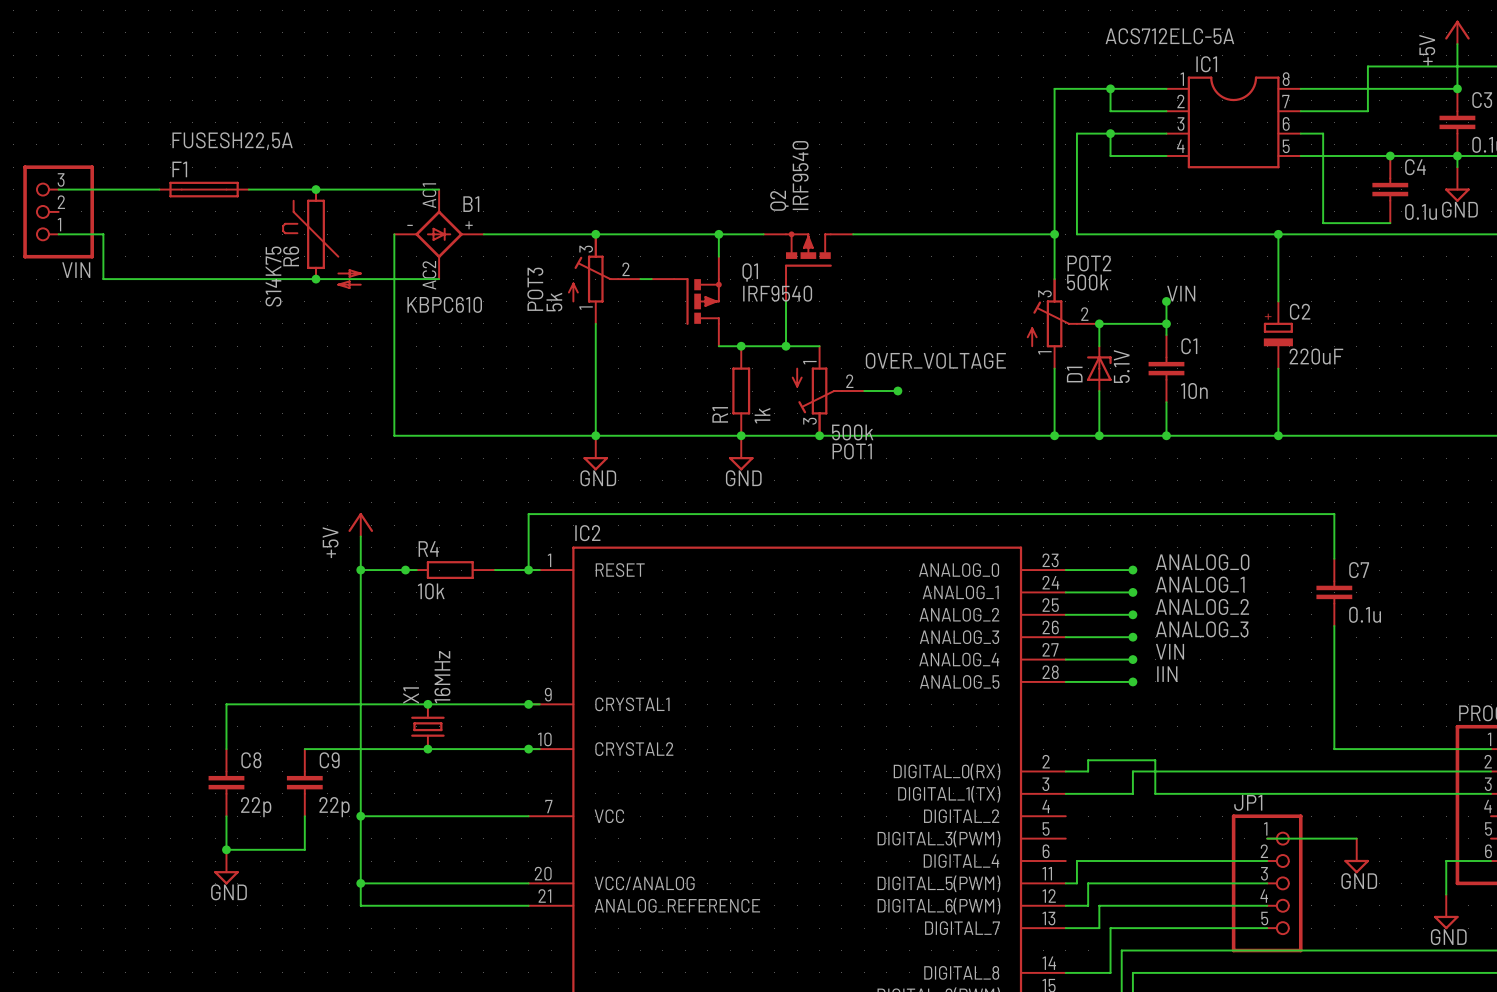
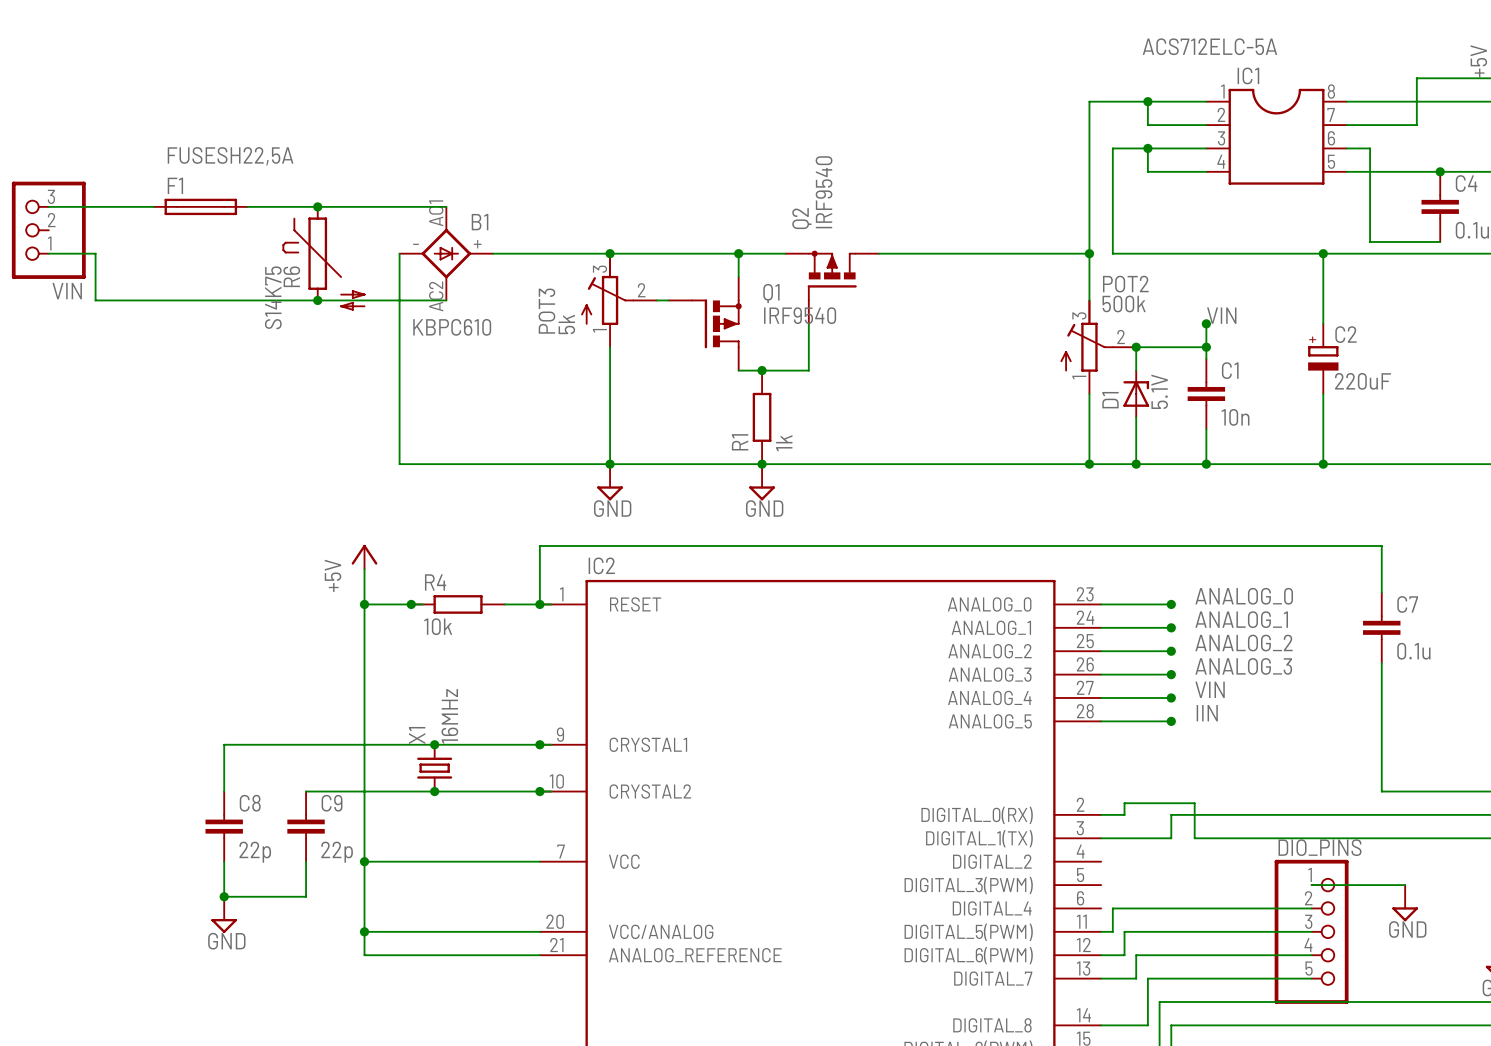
wire: (786, 346) (819, 346) -> none
junction: (786, 346) -> none
label: OVER_VOLTAGE (935, 360) -> none
POT1: 500k (828, 391) -> none
wire: (864, 391) (897, 391) -> none
junction: (897, 391) -> none
junction: (819, 435) -> none
JP1 name: JP1 (1248, 802) -> DIO_PINS (1320, 847)

